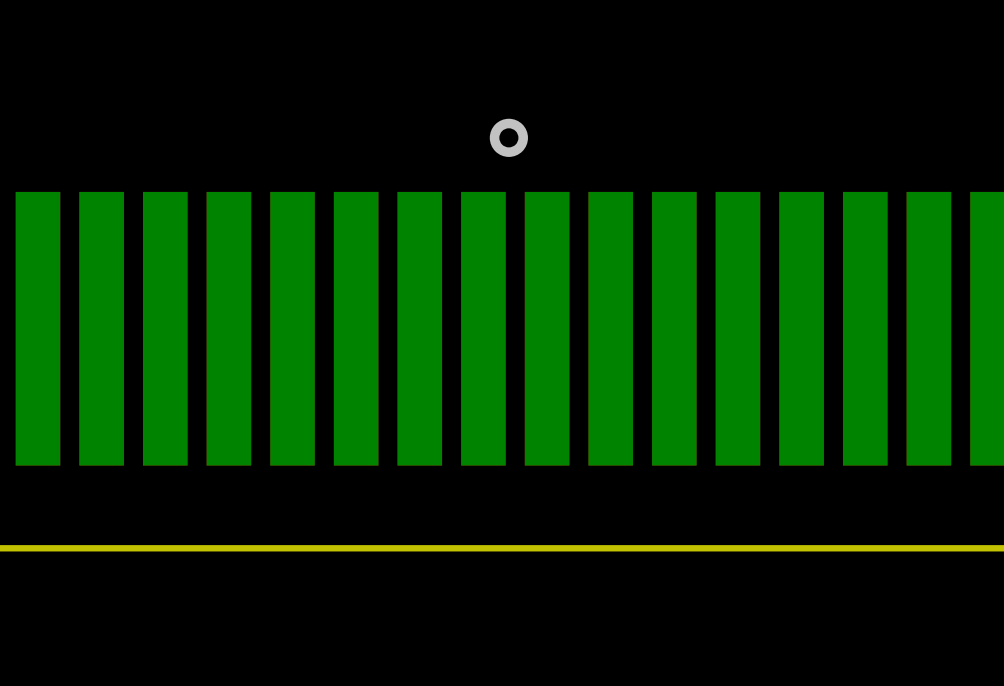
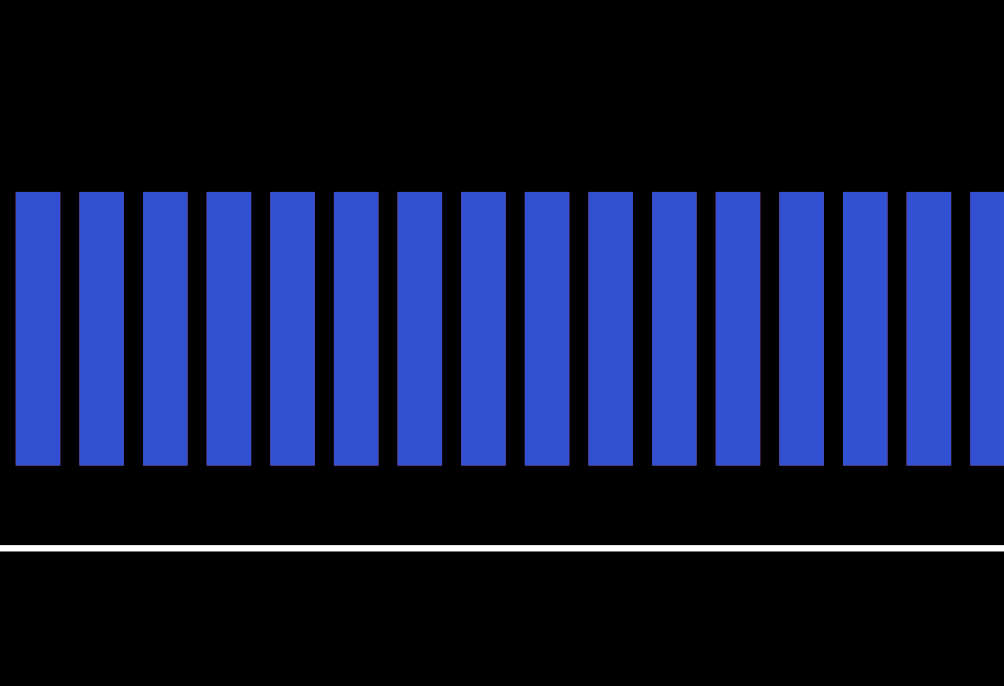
via: (508, 137) -> none

